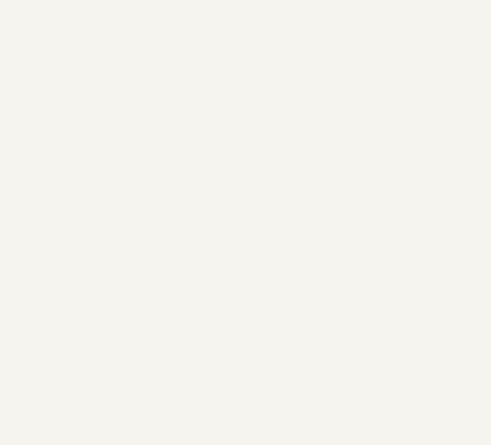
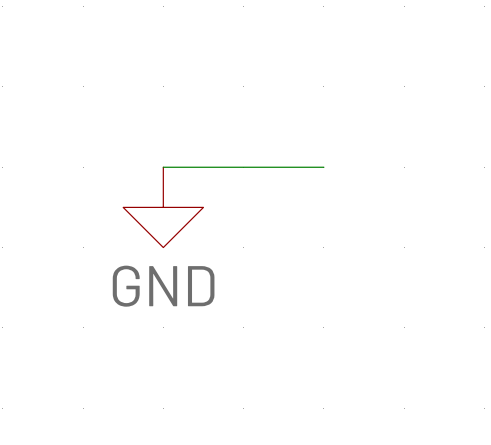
wire: none -> (163, 167) (323, 167)
power symbol: none -> GND (163, 207)

